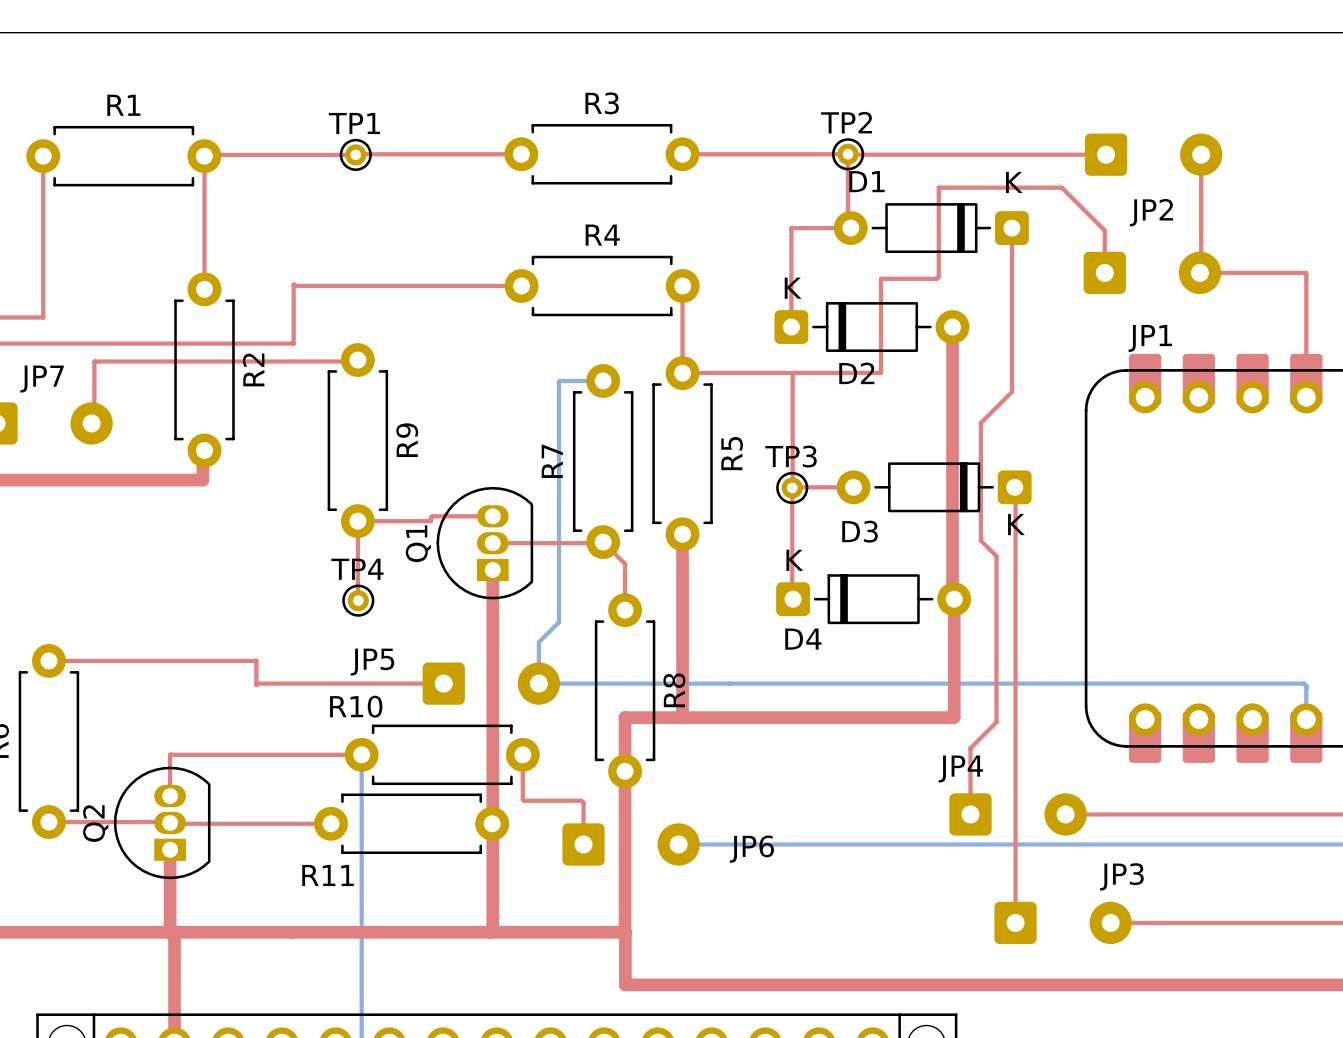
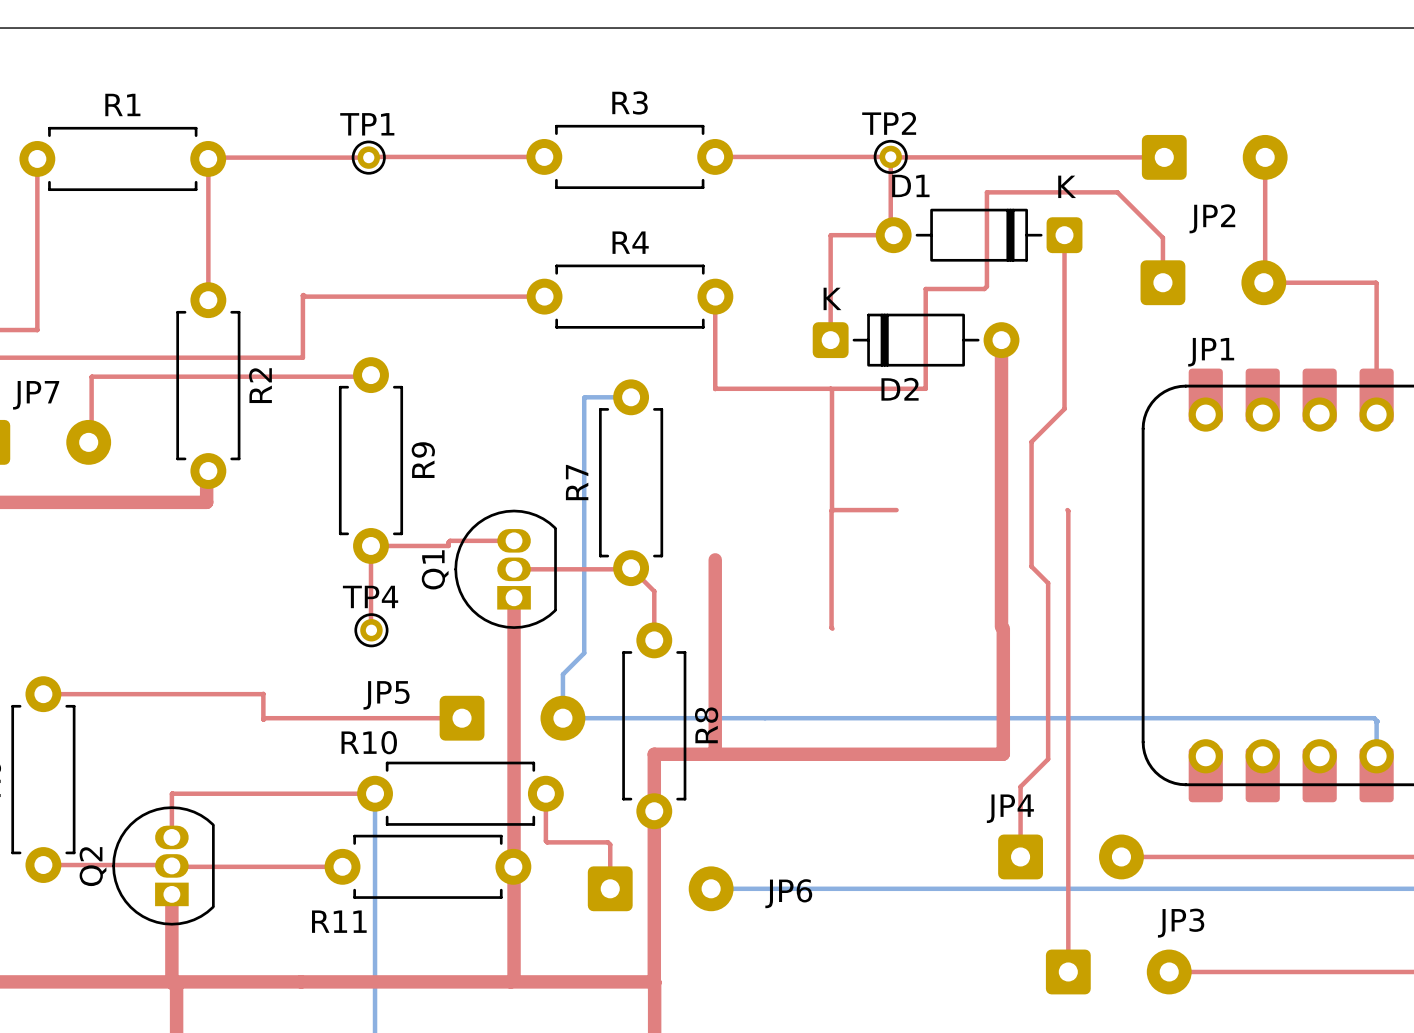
R5: (682, 453) -> none
TP3: (792, 487) -> none
D3: (934, 487) -> none
D4: (873, 599) -> none

